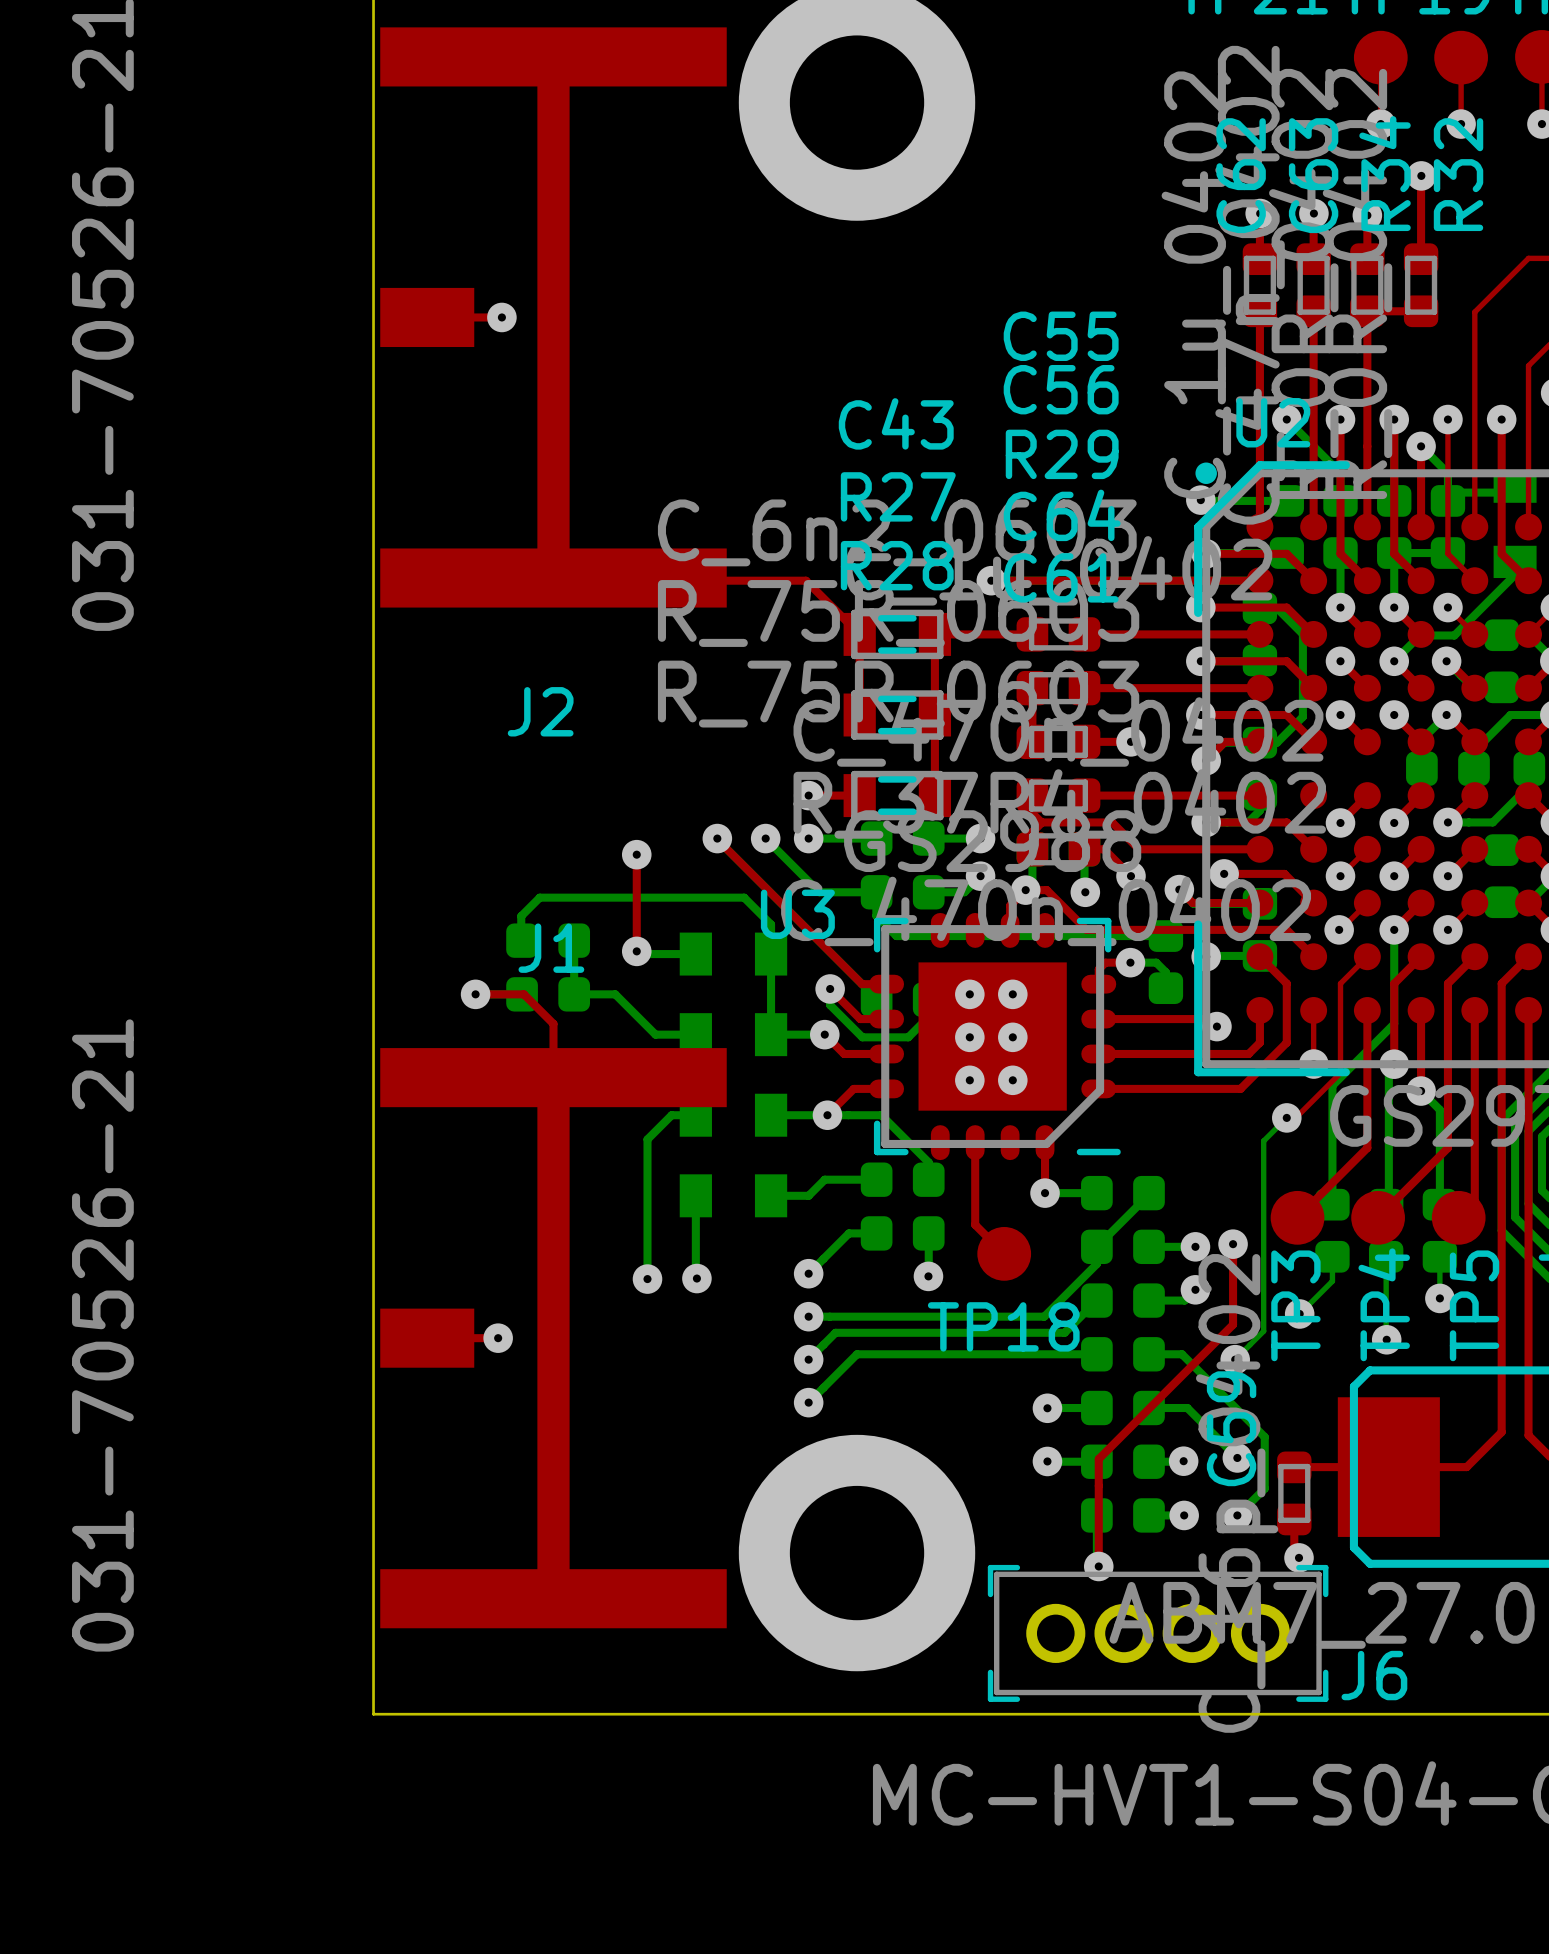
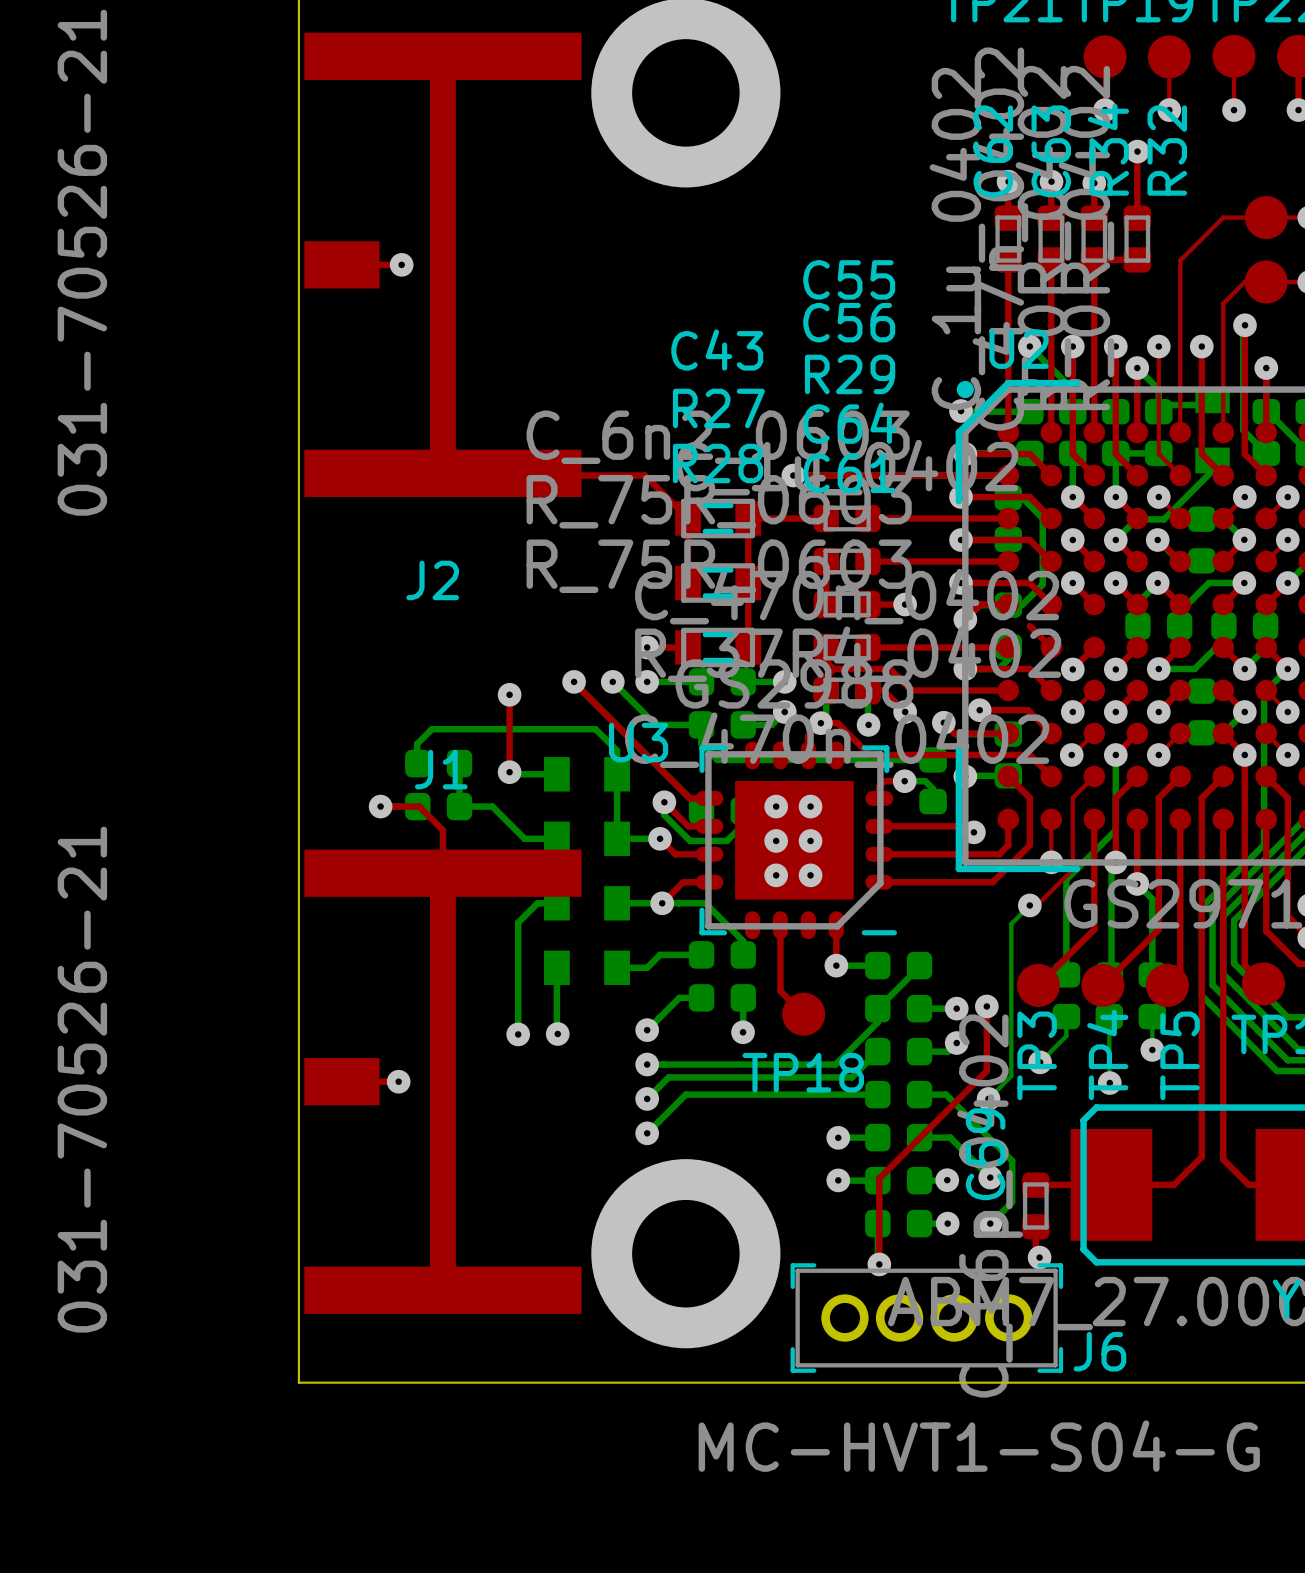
top track: none -> (1029, 626) (1051, 647)

